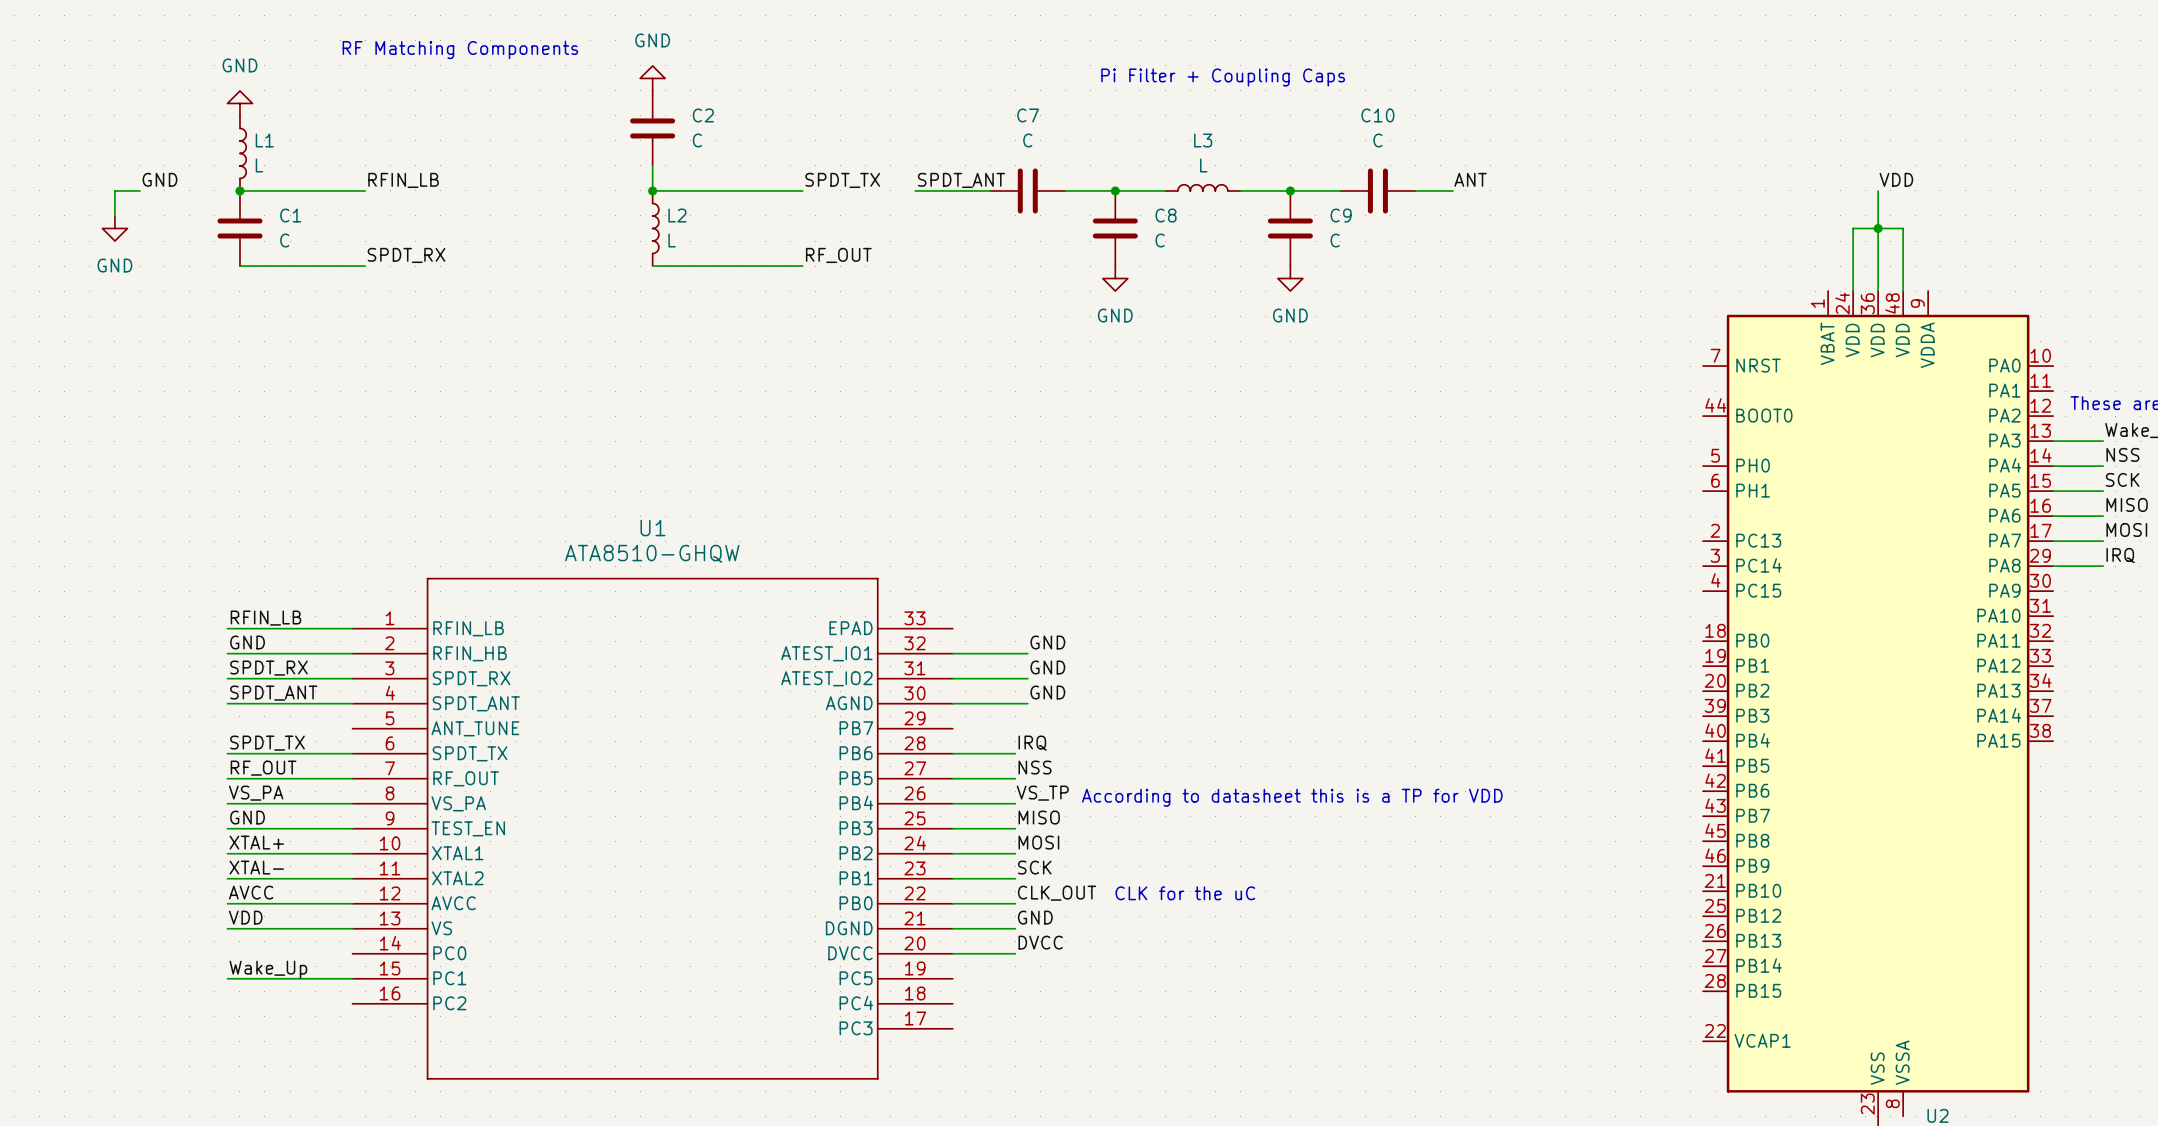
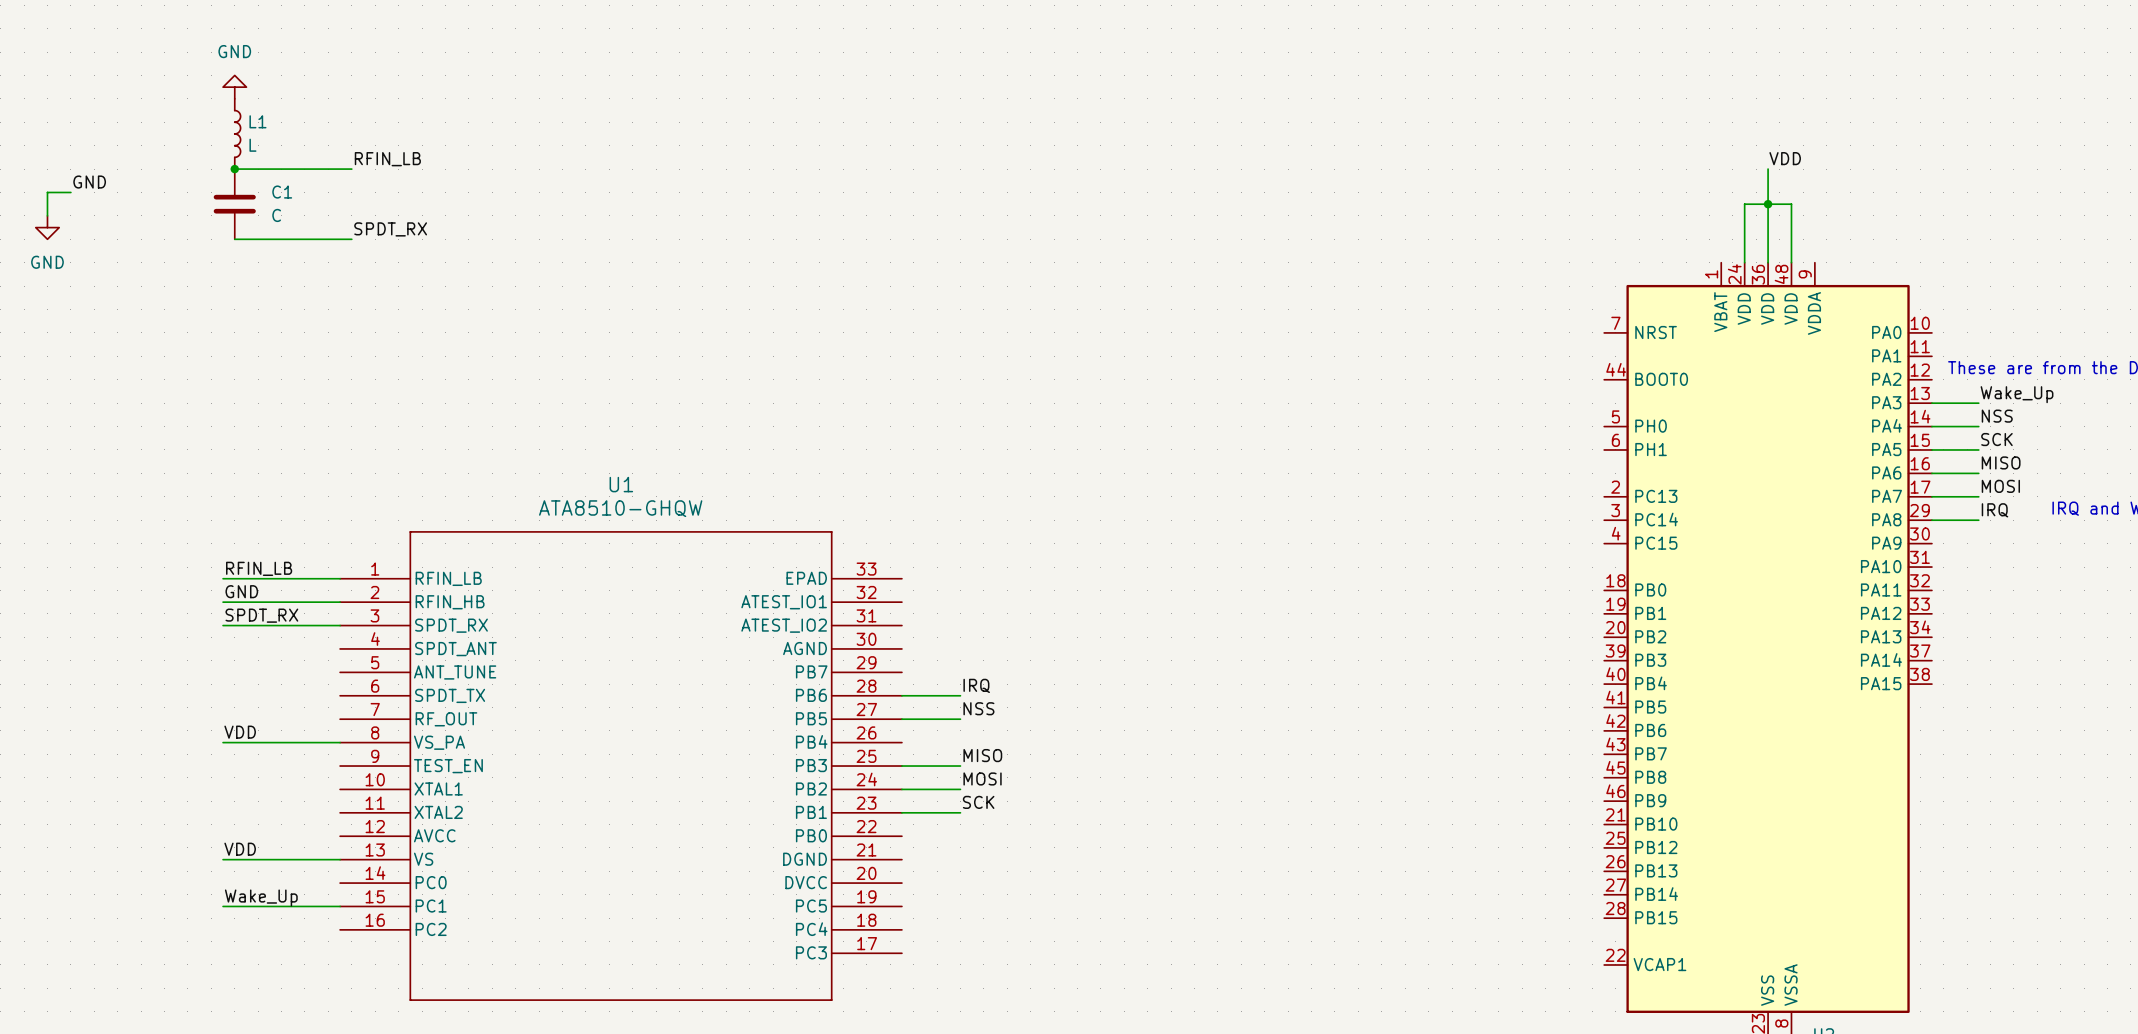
text: RF Matching Components (460, 50) -> none
text: Pi Filter + Coupling Caps (1223, 77) -> none
power symbol: GND (652, 78) -> none
C2: C (652, 128) -> none
wire: (652, 165) (652, 190) (802, 190) -> none
label position: GND (159, 179) -> GND (89, 182)
label: ANT (1470, 179) -> none
label: SPDT_TX (842, 180) -> none
label: SPDT_ANT (961, 180) -> none
L3: L (1202, 187) -> none
wire: (139, 190) (114, 190) (114, 215) -> (70, 192) (47, 192) (47, 215)
junction: (652, 190) -> none
wire: (915, 190) (990, 190) -> none
C7: C (1027, 190) -> none
wire: (1065, 190) (1165, 190) -> none
junction: (1115, 190) -> none
wire: (1240, 190) (1340, 190) -> none
junction: (1290, 190) -> none
C10: C (1377, 190) -> none
wire: (1415, 190) (1452, 190) -> none
power symbol position: GND (114, 228) -> GND (47, 227)
L2: L (655, 228) -> none
C8: C (1115, 228) -> none
C9: C (1290, 228) -> none
label: RF_OUT (838, 255) -> none
wire: (652, 266) (802, 266) -> none
power symbol: GND (1115, 278) -> none
power symbol: GND (1290, 278) -> none
label: GND (1047, 642) -> none
wire: (952, 653) (1027, 653) -> none
label: GND (1047, 667) -> none
wire: (952, 678) (1027, 678) -> none
label: GND (1047, 692) -> none
label: SPDT_ANT (273, 693) -> none
wire: (227, 703) (352, 703) -> none
wire: (952, 703) (1027, 703) -> none
label: SPDT_TX (267, 743) -> none
wire: (227, 753) (352, 753) -> none
label: RF_OUT (263, 768) -> none
wire: (227, 778) (352, 778) -> none
label: VS_PA (256, 793) -> VDD (240, 732)
label: VS_TP (1042, 793) -> none
text: According to datasheet this is a TP for VDD (1292, 797) -> none
wire: (952, 803) (1015, 803) -> none
label: GND (247, 817) -> none
wire: (227, 828) (352, 828) -> none
label: XTAL+ (256, 842) -> none
wire: (227, 853) (352, 853) -> none
label: XTAL- (256, 867) -> none
wire: (227, 878) (352, 878) -> none
label: AVCC (251, 892) -> none
label: CLK_OUT (1057, 893) -> none
text: CLK for the uC (1185, 893) -> none
wire: (227, 903) (352, 903) -> none
wire: (952, 903) (1015, 903) -> none
label: GND (1035, 917) -> none
wire: (952, 928) (1015, 928) -> none
label: DVCC (1040, 942) -> none
wire: (952, 953) (1015, 953) -> none

